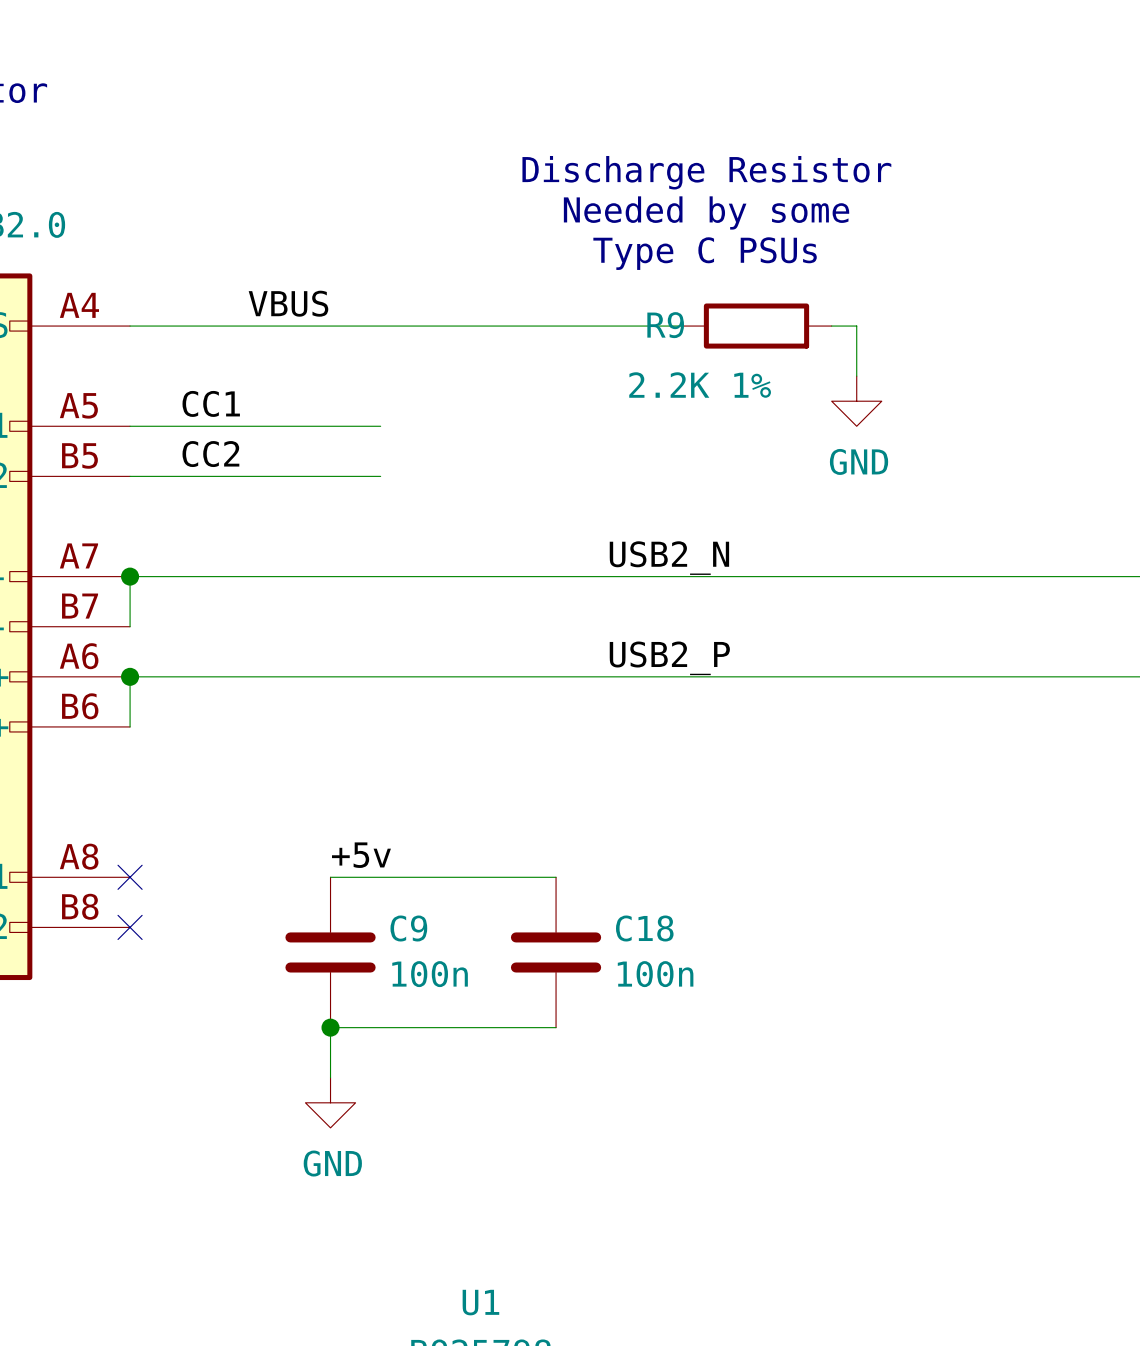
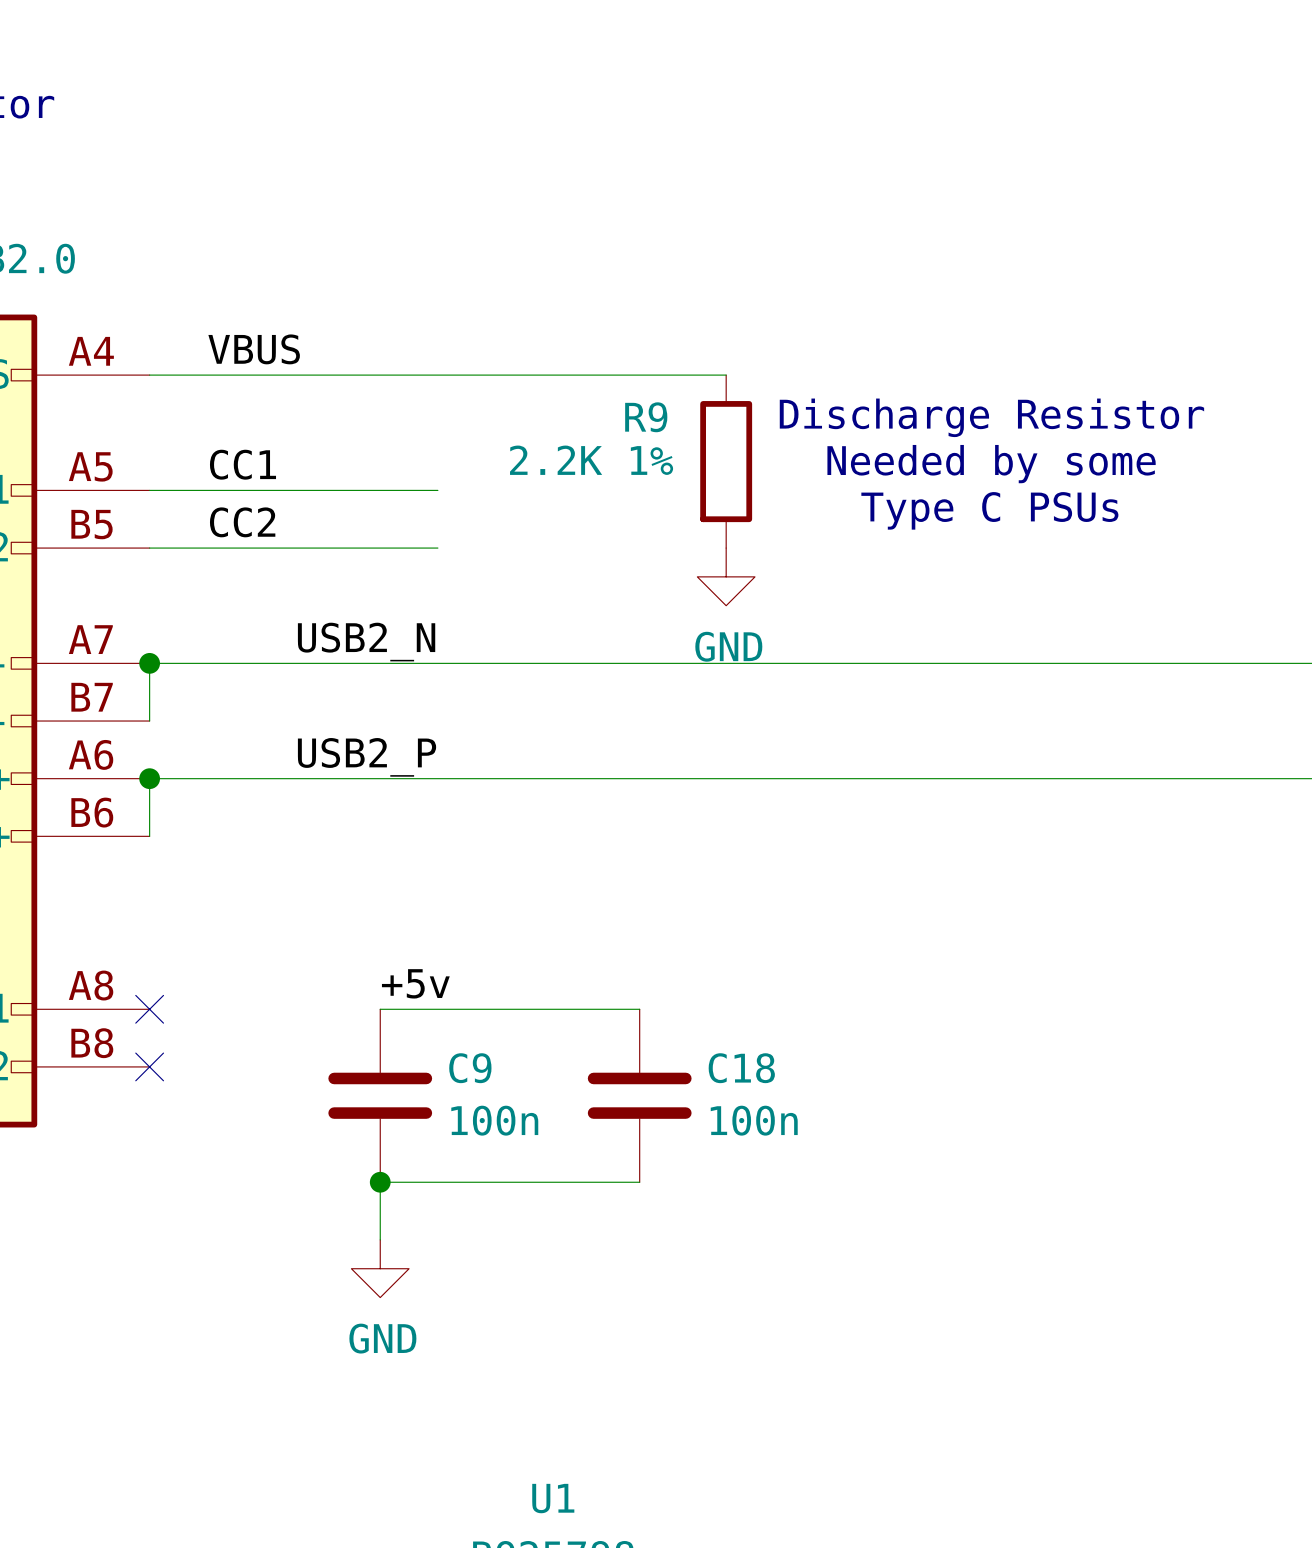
text position: Discharge Resistor (706, 172) -> Discharge Resistor (991, 417)
text position: Needed by some (706, 212) -> Needed by some (991, 464)
text position: Type C PSUs (705, 253) -> Type C PSUs (989, 510)
label position: VBUS (288, 303) -> VBUS (254, 349)
R9 name position: R9 (665, 325) -> R9 (646, 417)
wire: (631, 326) (681, 326) -> none
R9 rotation: 0° (756, 326) -> 90° clockwise (726, 461)
R9 position: (756, 326) -> (726, 461)
wire: (831, 326) (856, 326) (856, 376) -> none
R9 value position: 2.2K 1% (700, 385) -> 2.2K 1% (591, 460)
power symbol position: GND (856, 401) -> GND (726, 576)
label position: USB2_N (669, 558) -> USB2_N (366, 642)
label position: USB2_P (669, 658) -> USB2_P (367, 757)

